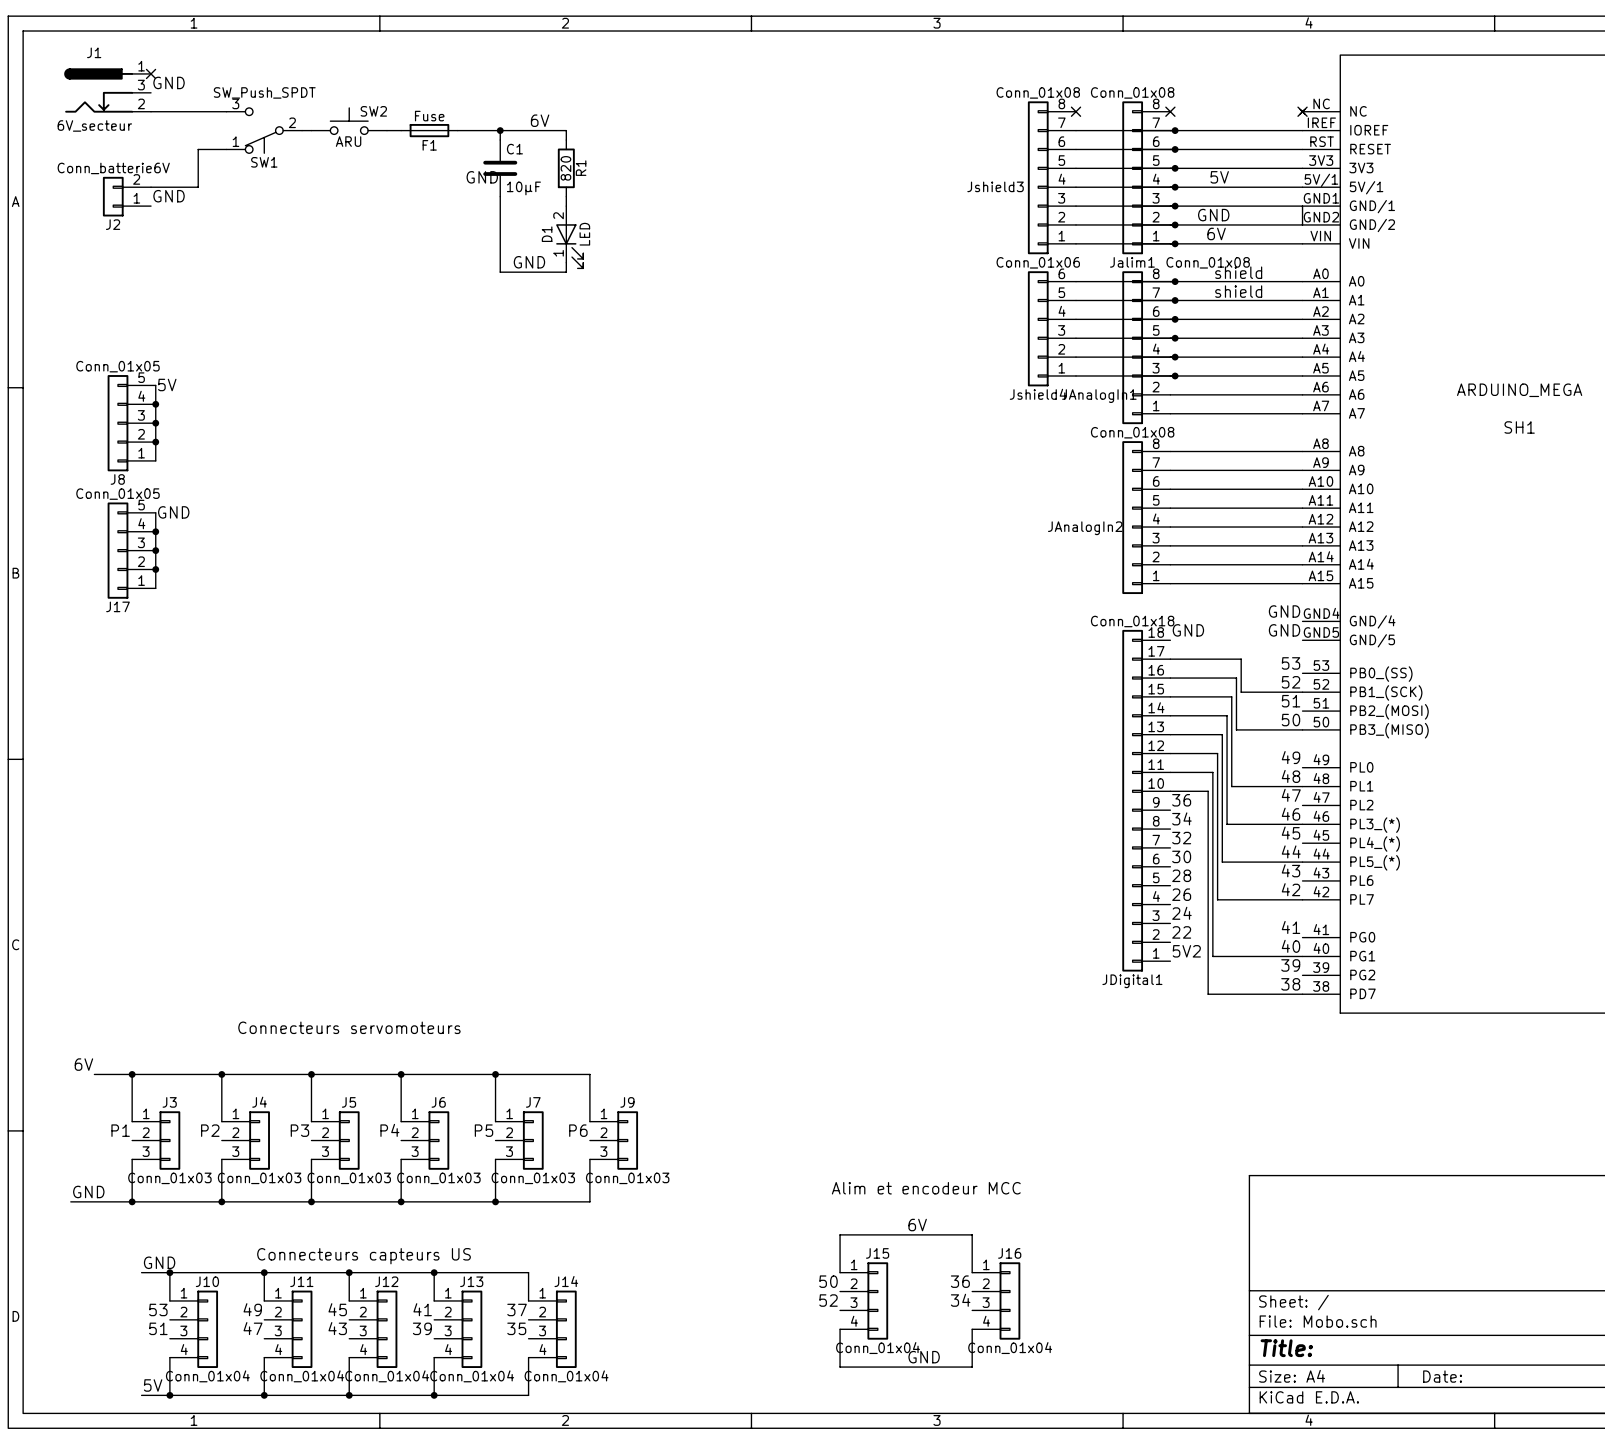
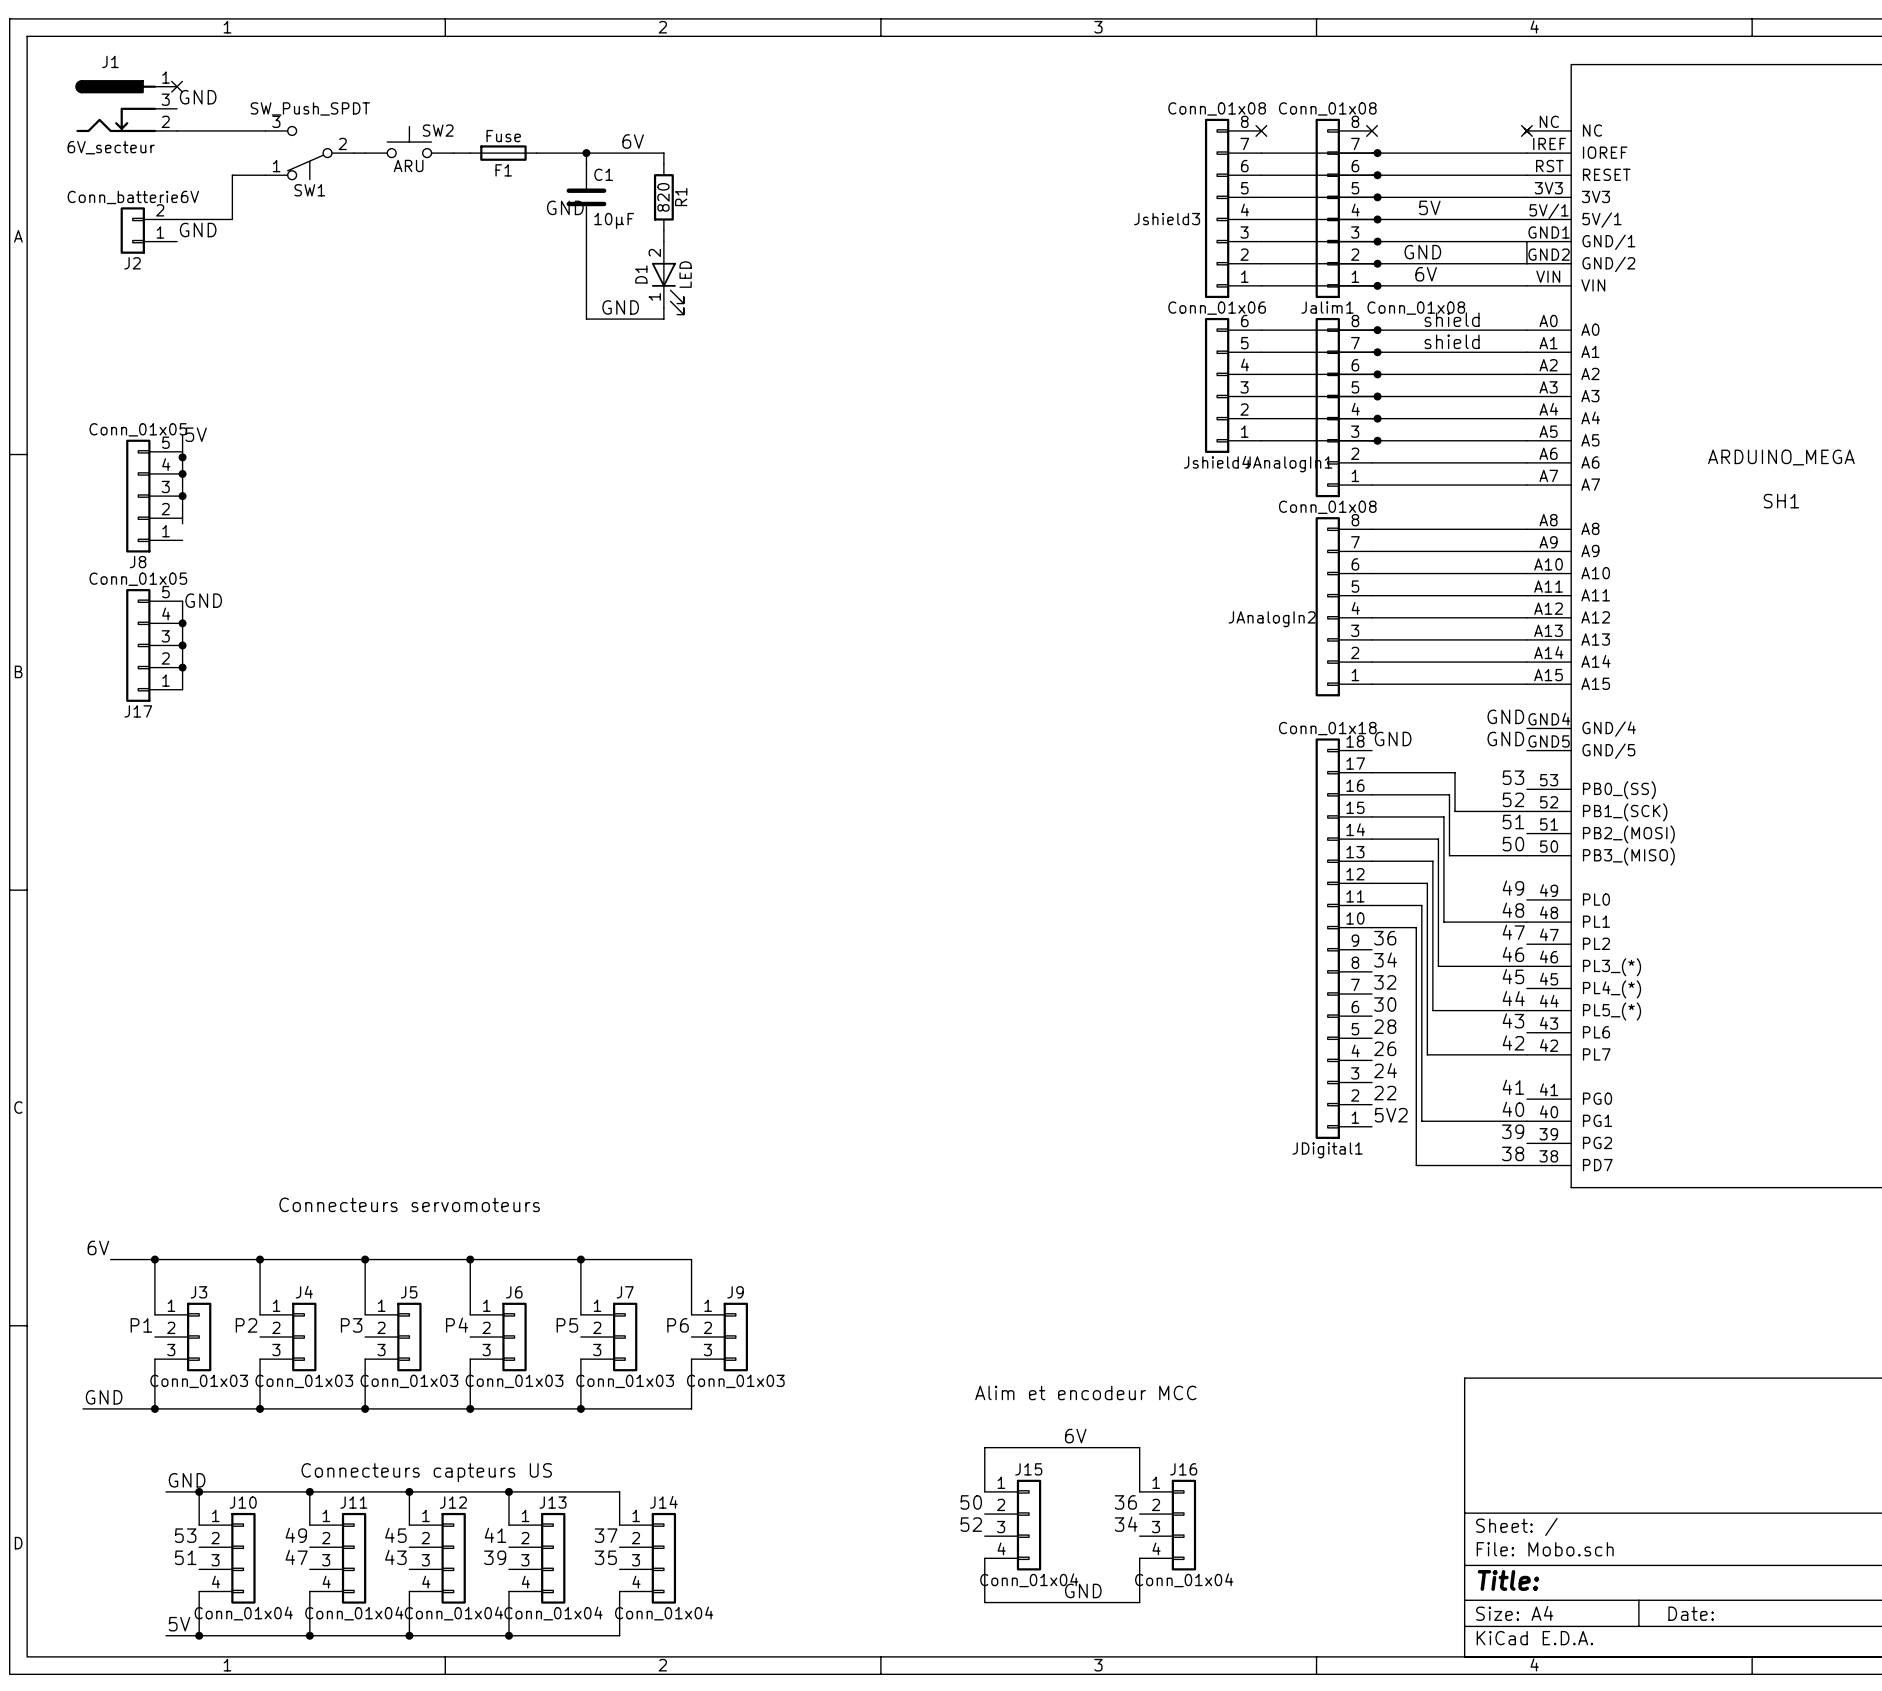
label position: 5V (167, 384) -> 5V (196, 434)
junction: none -> (182, 457)
junction: (155, 442) -> none
wire: (155, 446) (155, 460) -> (182, 435) (182, 451)

